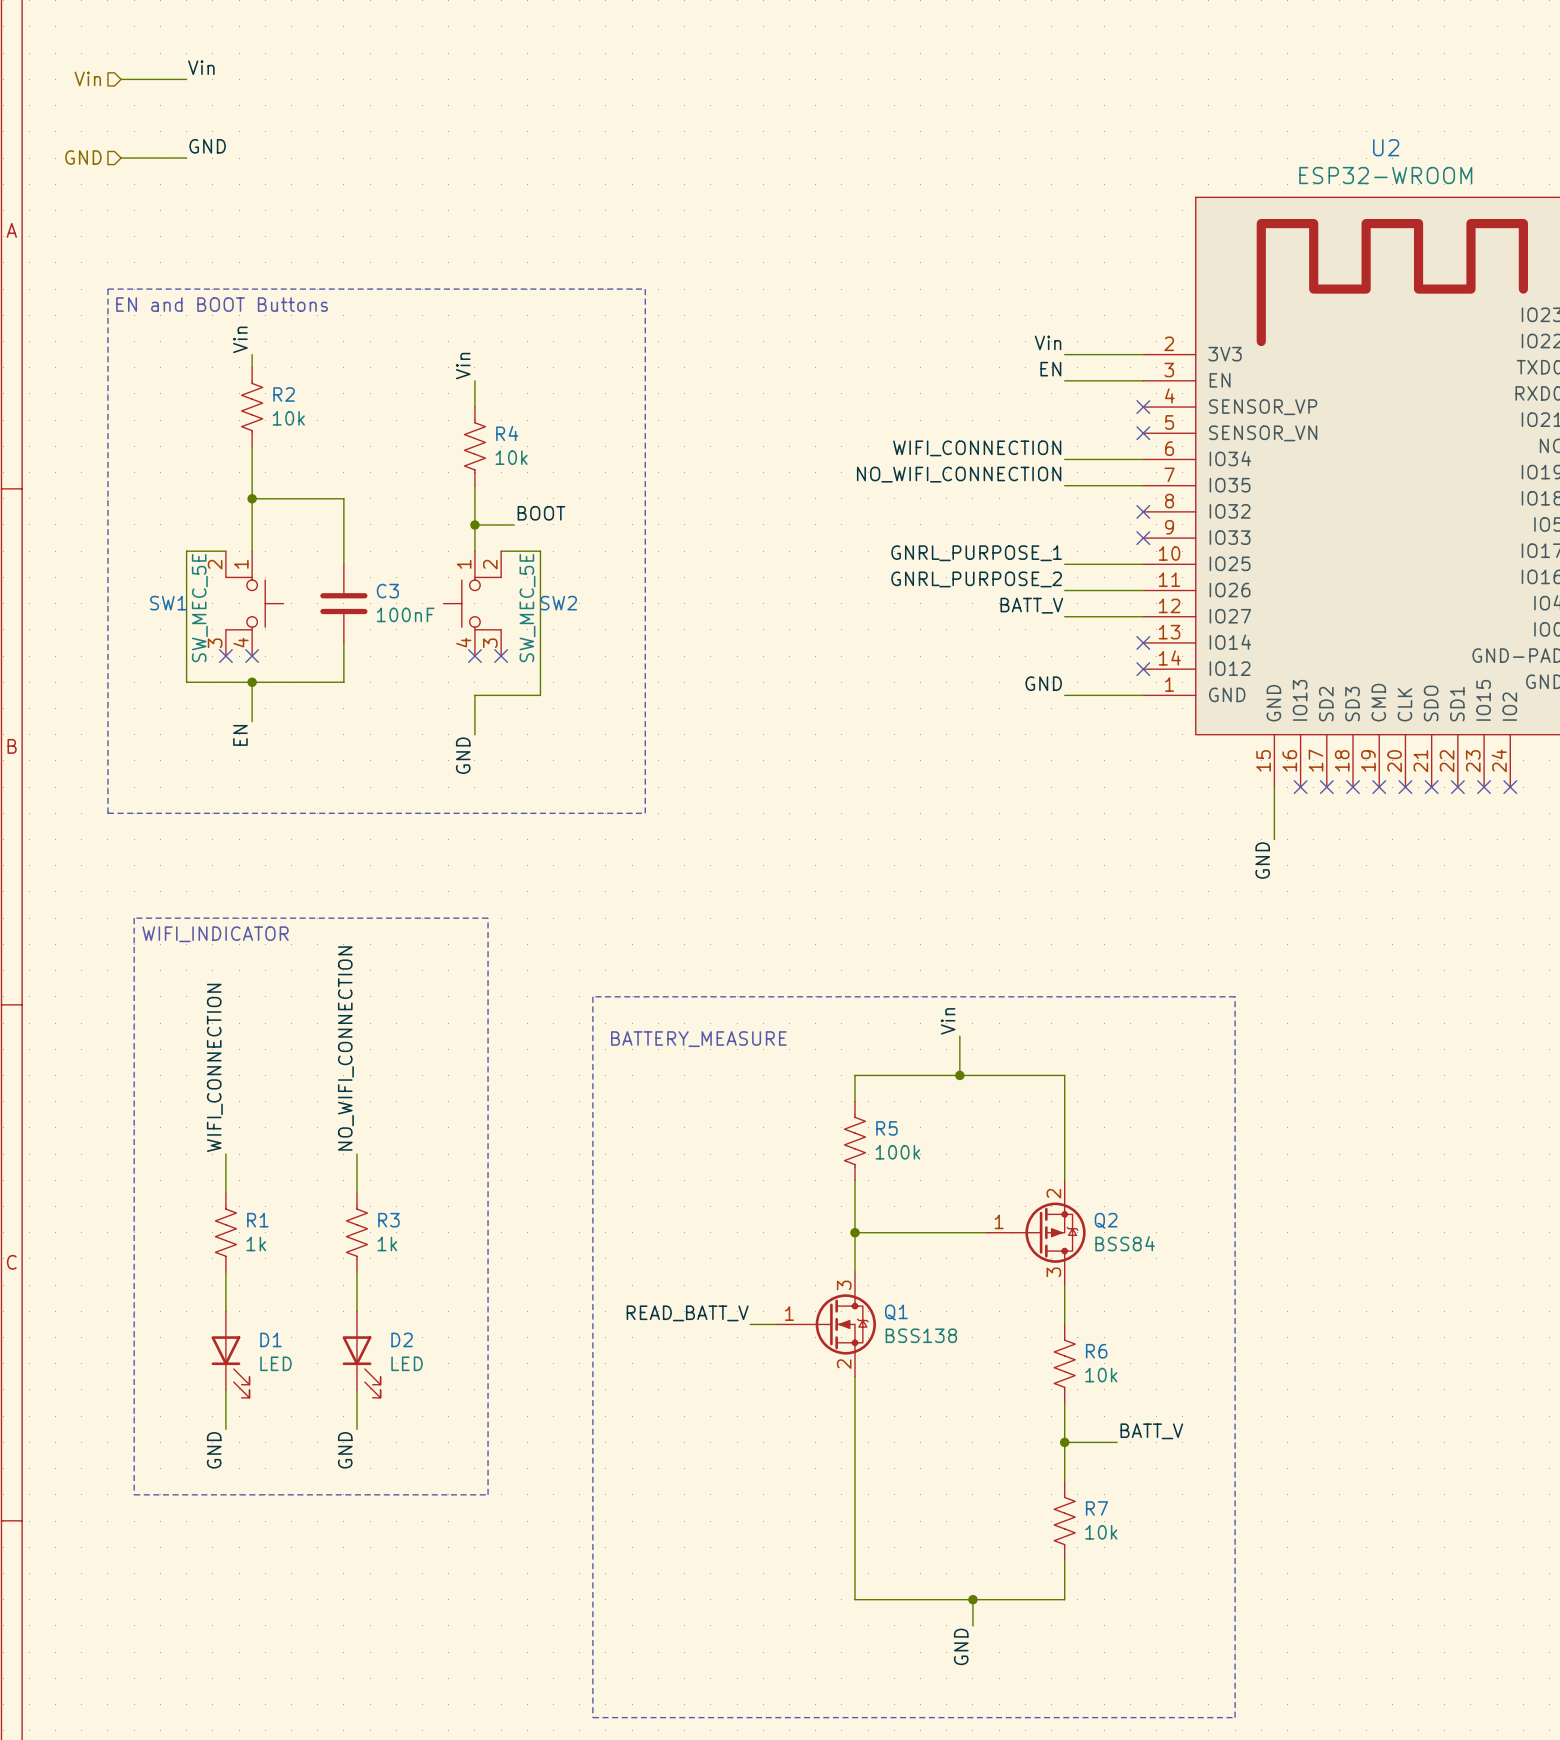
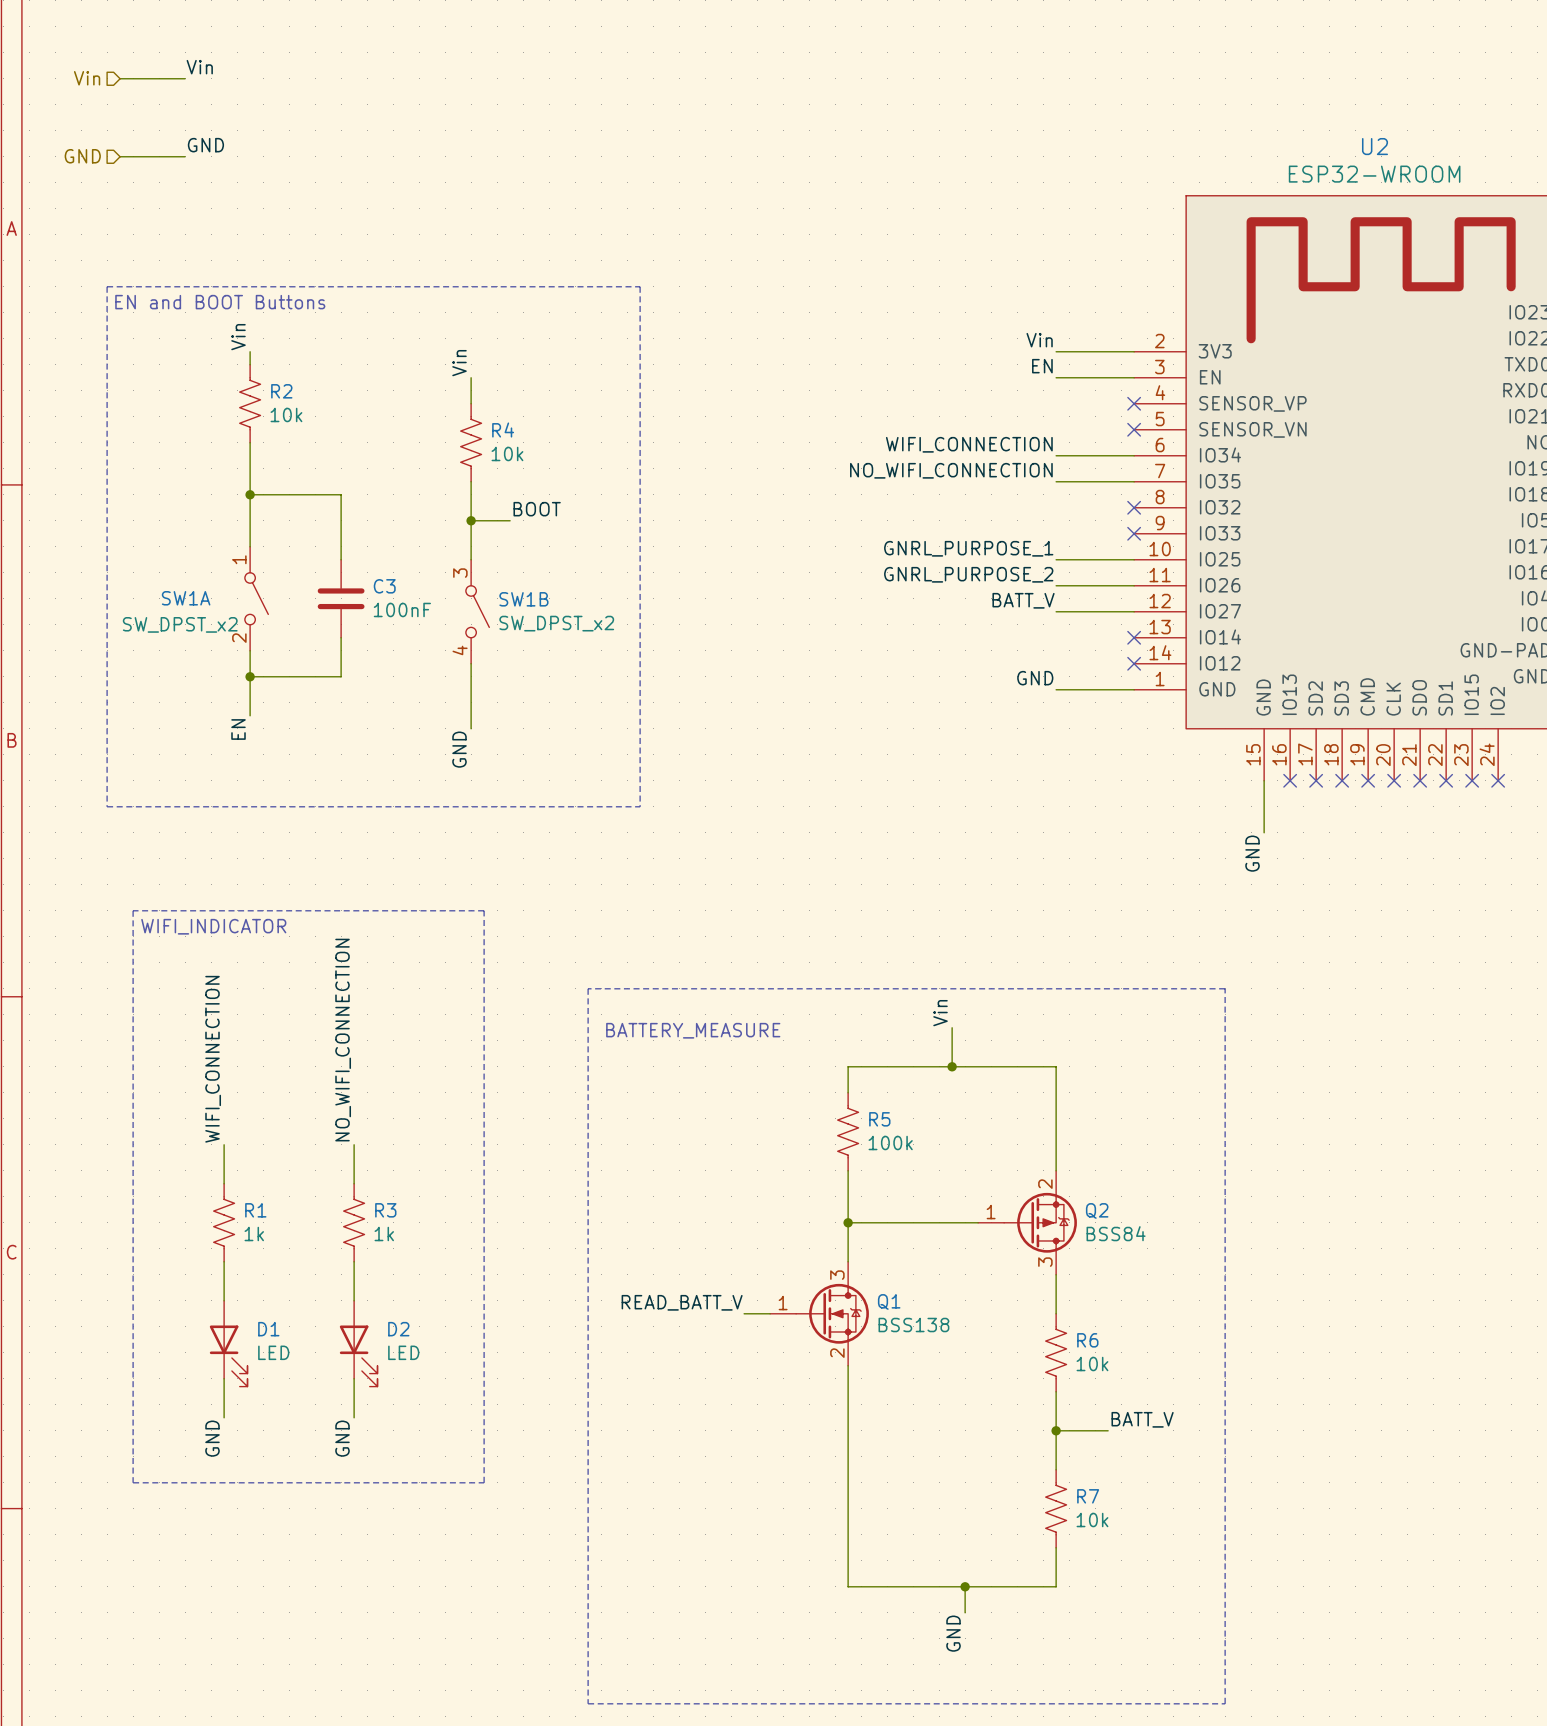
wire: (225, 551) (186, 551) (186, 682) (252, 682) -> (250, 650) (250, 676)
wire: (501, 551) (540, 551) (540, 695) (474, 695) -> (471, 663) (471, 689)
SW1: SW_MEC_5E (254, 603) -> none
SW1A: none -> SW_DPST_x2 (256, 598)
SW2: SW_MEC_5E (472, 603) -> none
SW1B: none -> SW_DPST_x2 (477, 611)
no-connect mark: (225, 656) -> none
no-connect mark: (252, 656) -> none
no-connect mark: (474, 656) -> none
no-connect mark: (501, 656) -> none

